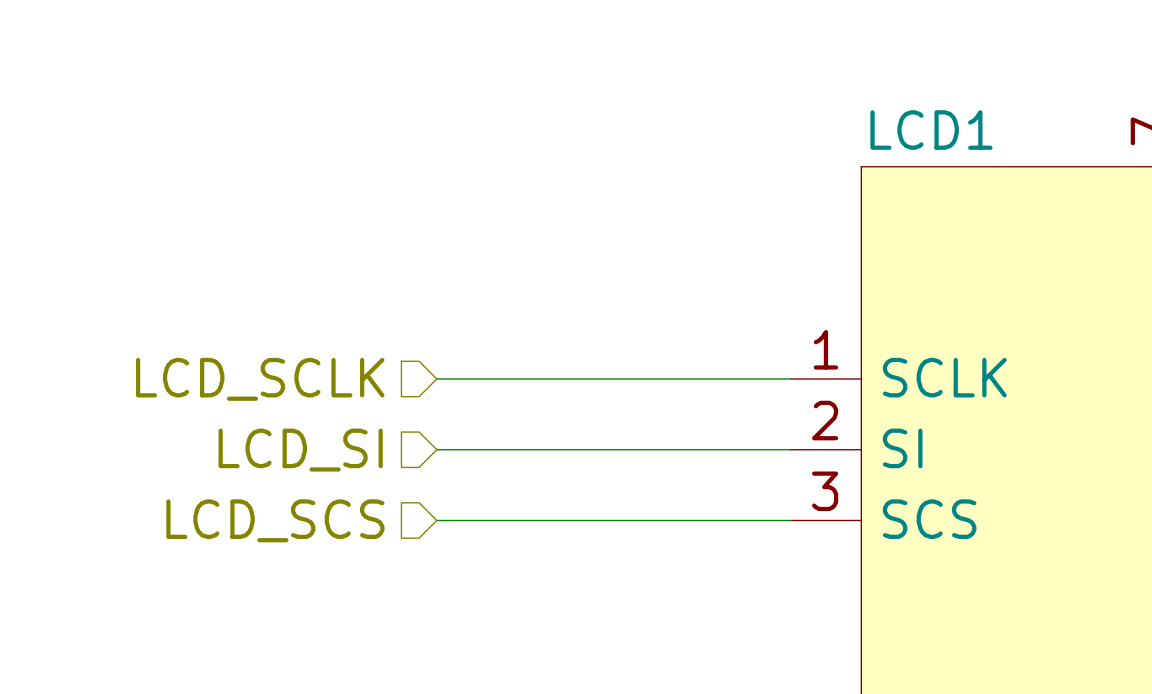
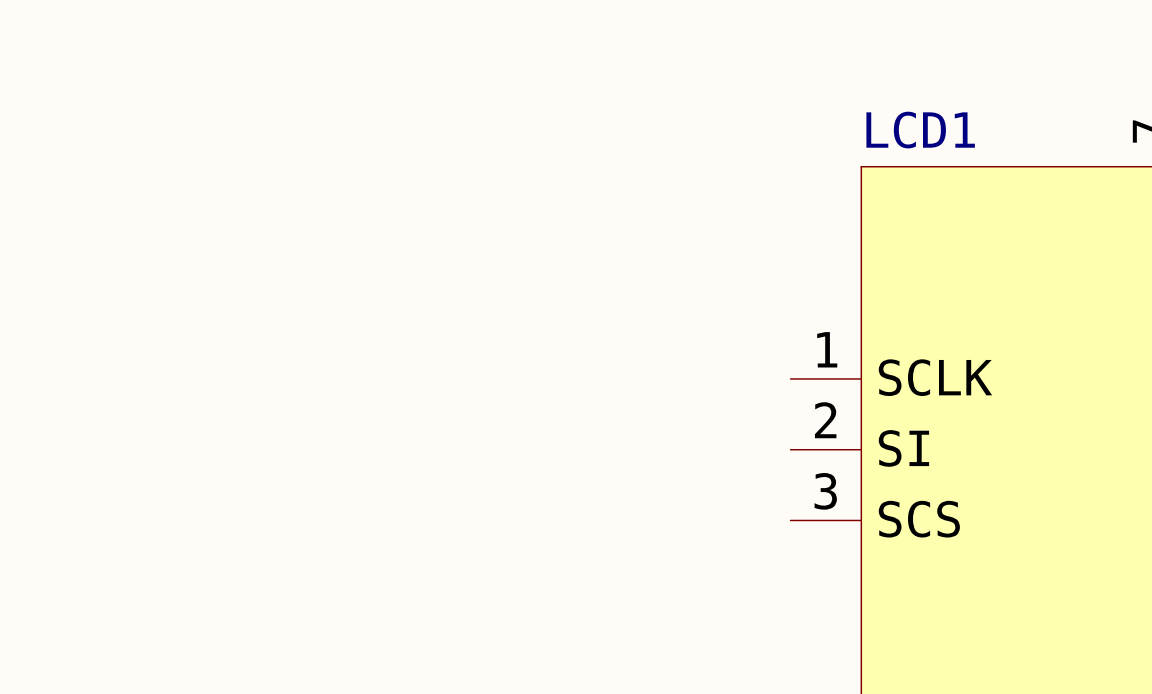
wire: (436, 378) (790, 378) -> none
hierarchical label: LCD_SCLK (260, 379) -> none
wire: (436, 449) (790, 449) -> none
hierarchical label: LCD_SI (300, 450) -> none
hierarchical label: LCD_SCS (275, 520) -> none
wire: (436, 520) (790, 520) -> none

